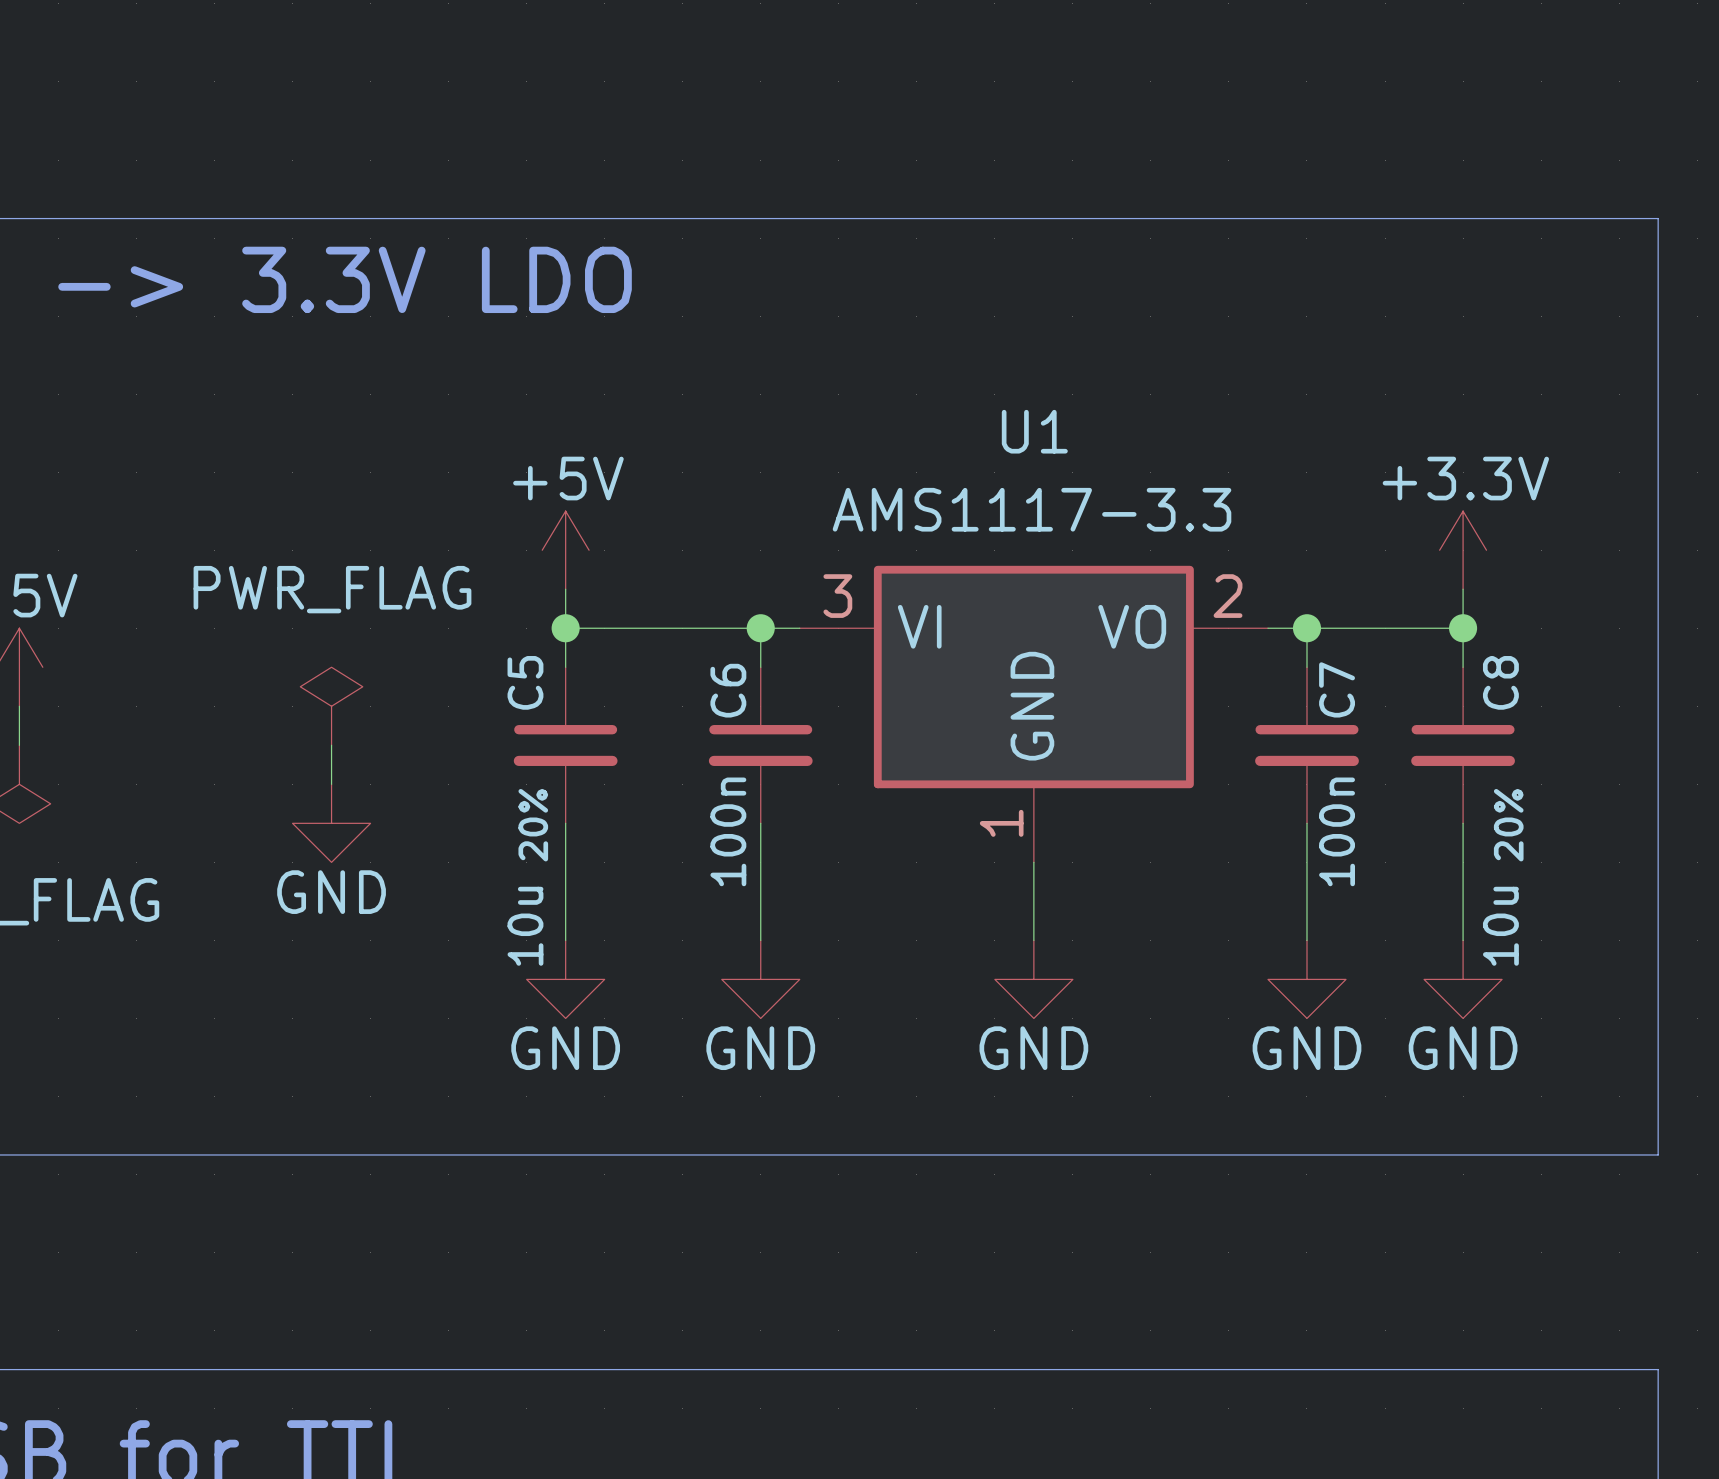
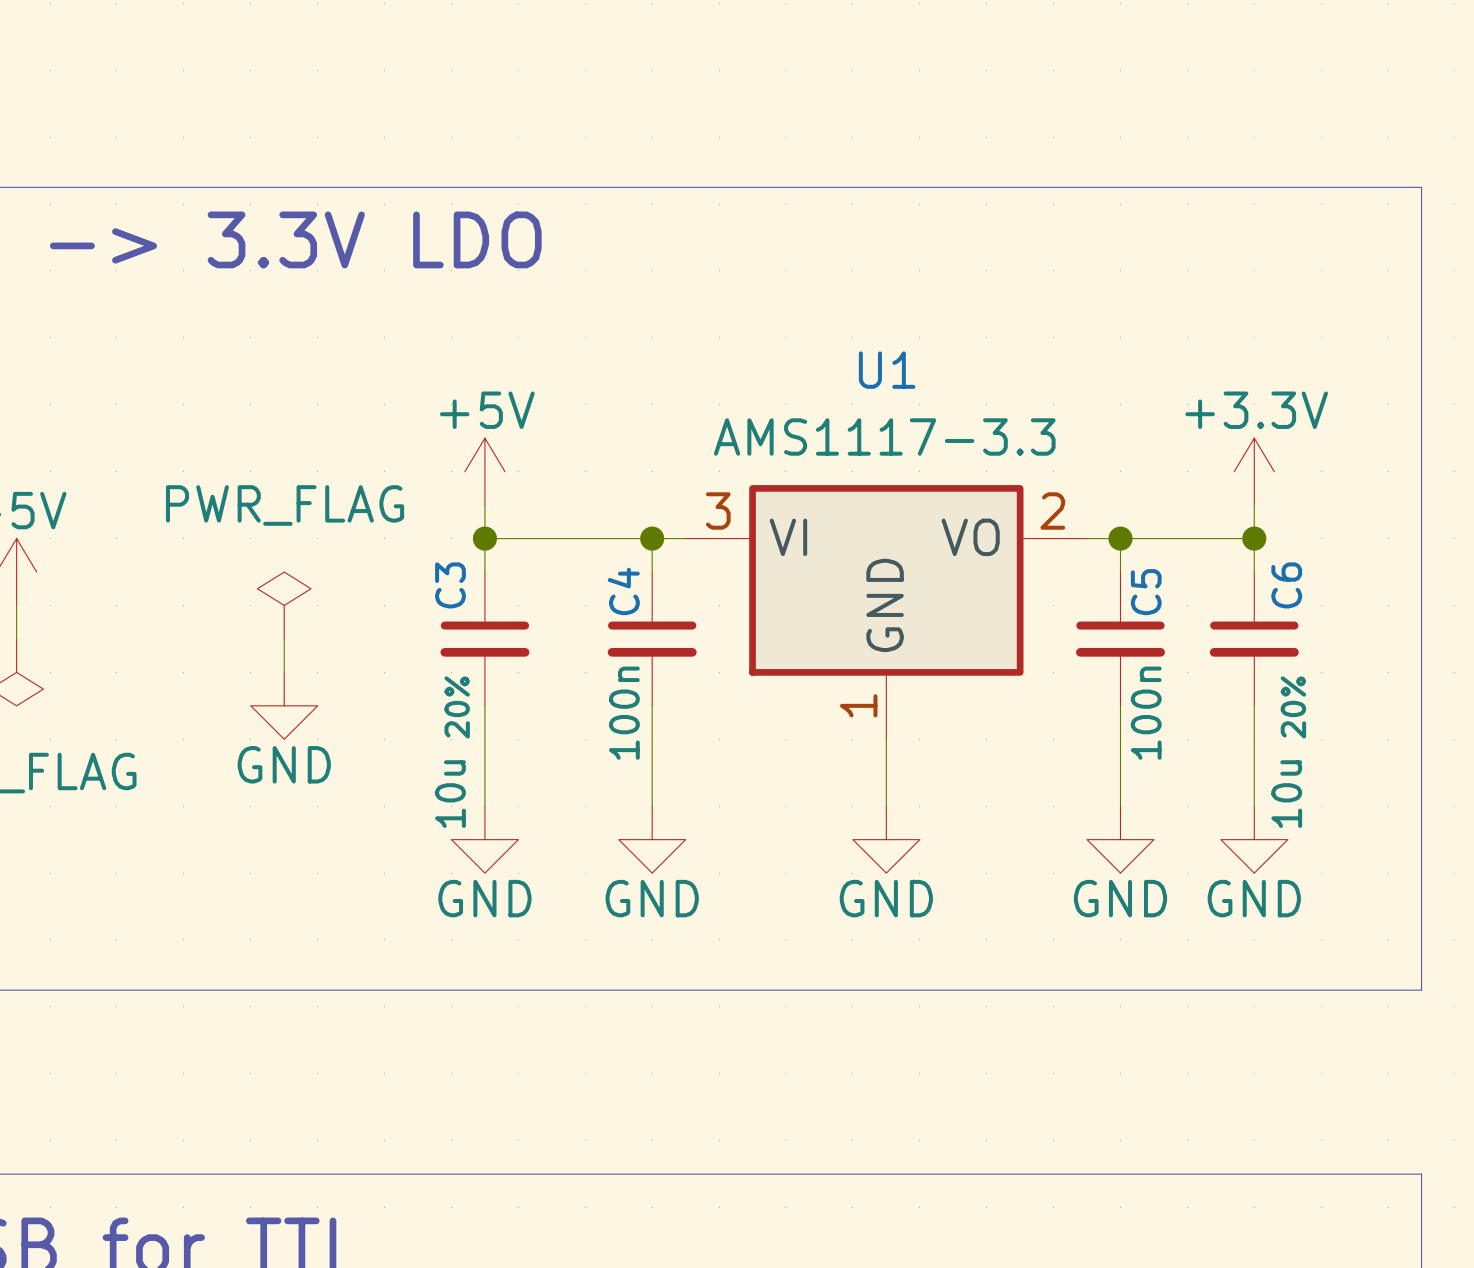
C5 name: C5 (525, 682) -> C3 (450, 585)
C8 name: C8 (1500, 682) -> C6 (1286, 585)
C7 name: C7 (1337, 689) -> C5 (1146, 592)
C6 name: C6 (728, 690) -> C4 (623, 591)

